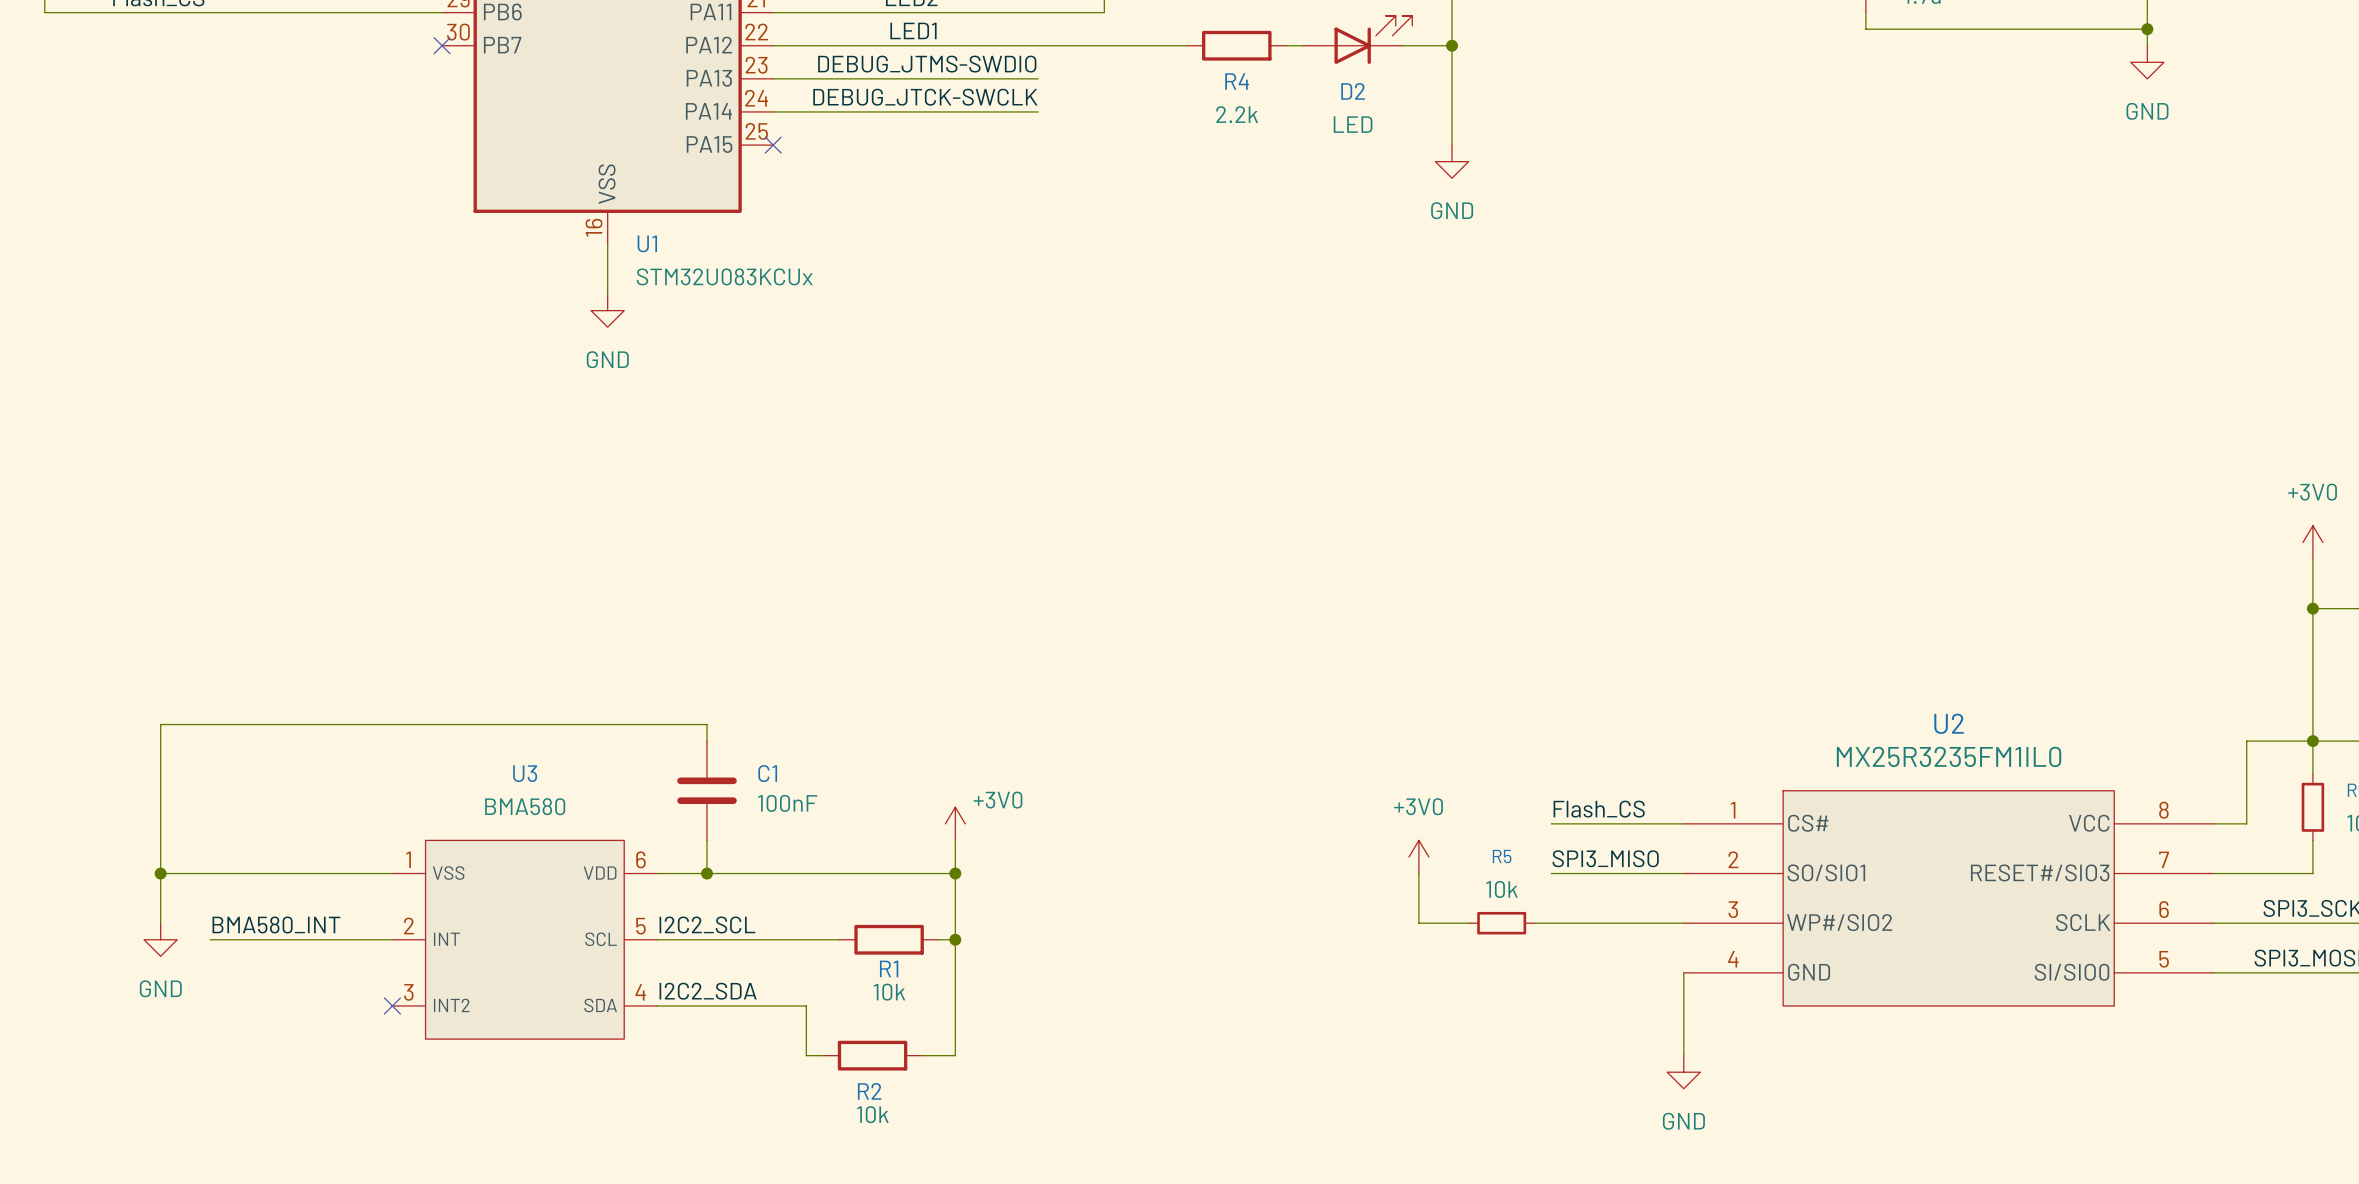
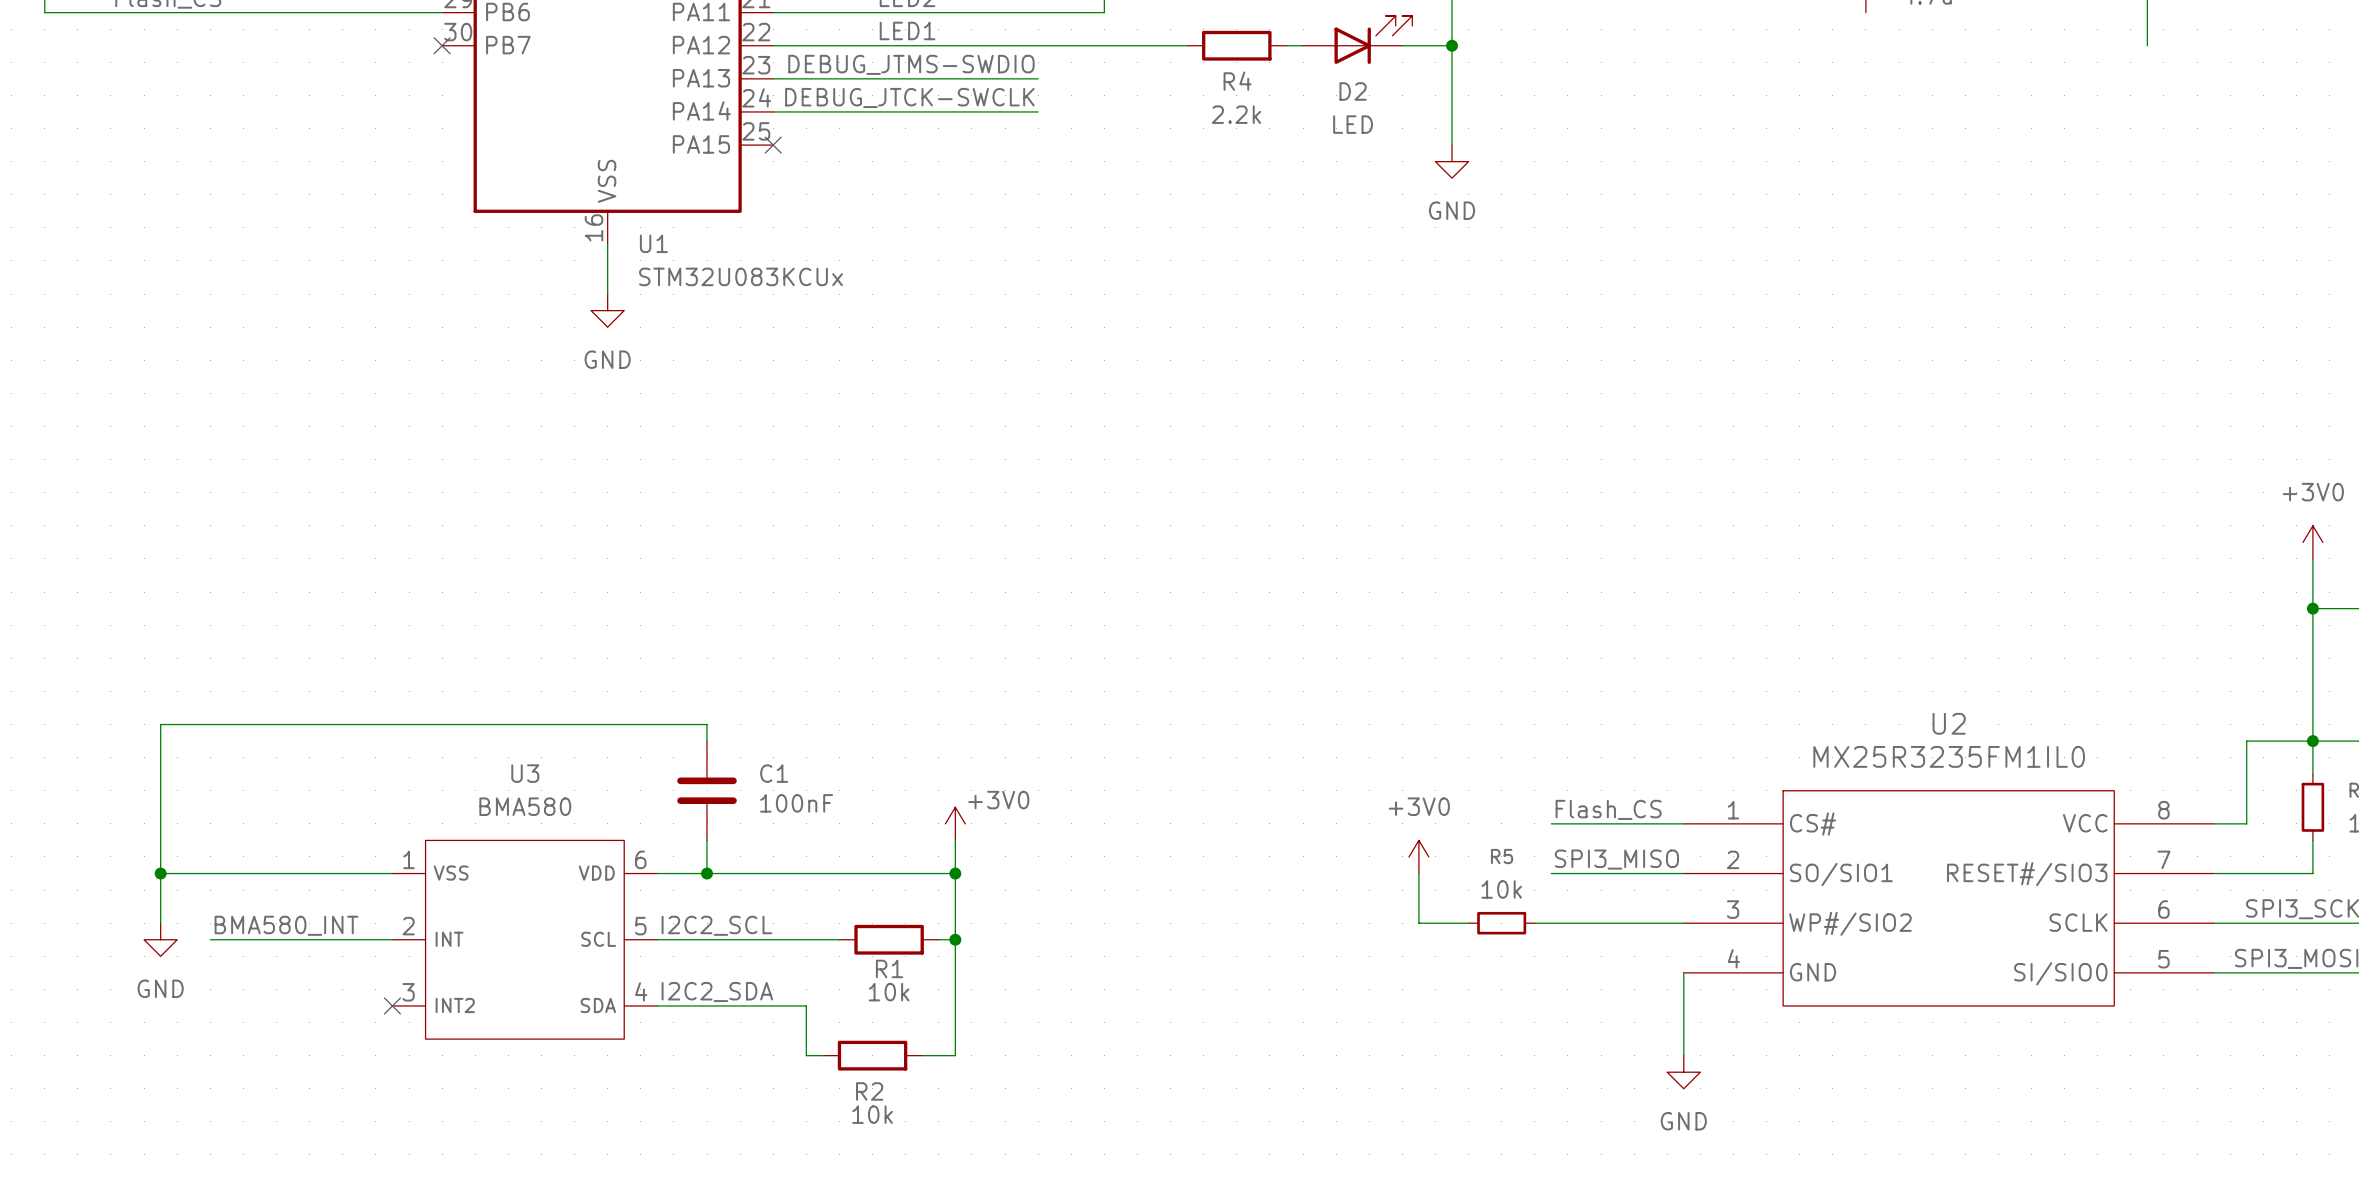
wire: (1865, 12) (1865, 29) (2147, 29) -> none
junction: (2147, 29) -> none
power symbol: GND (2147, 62) -> none

